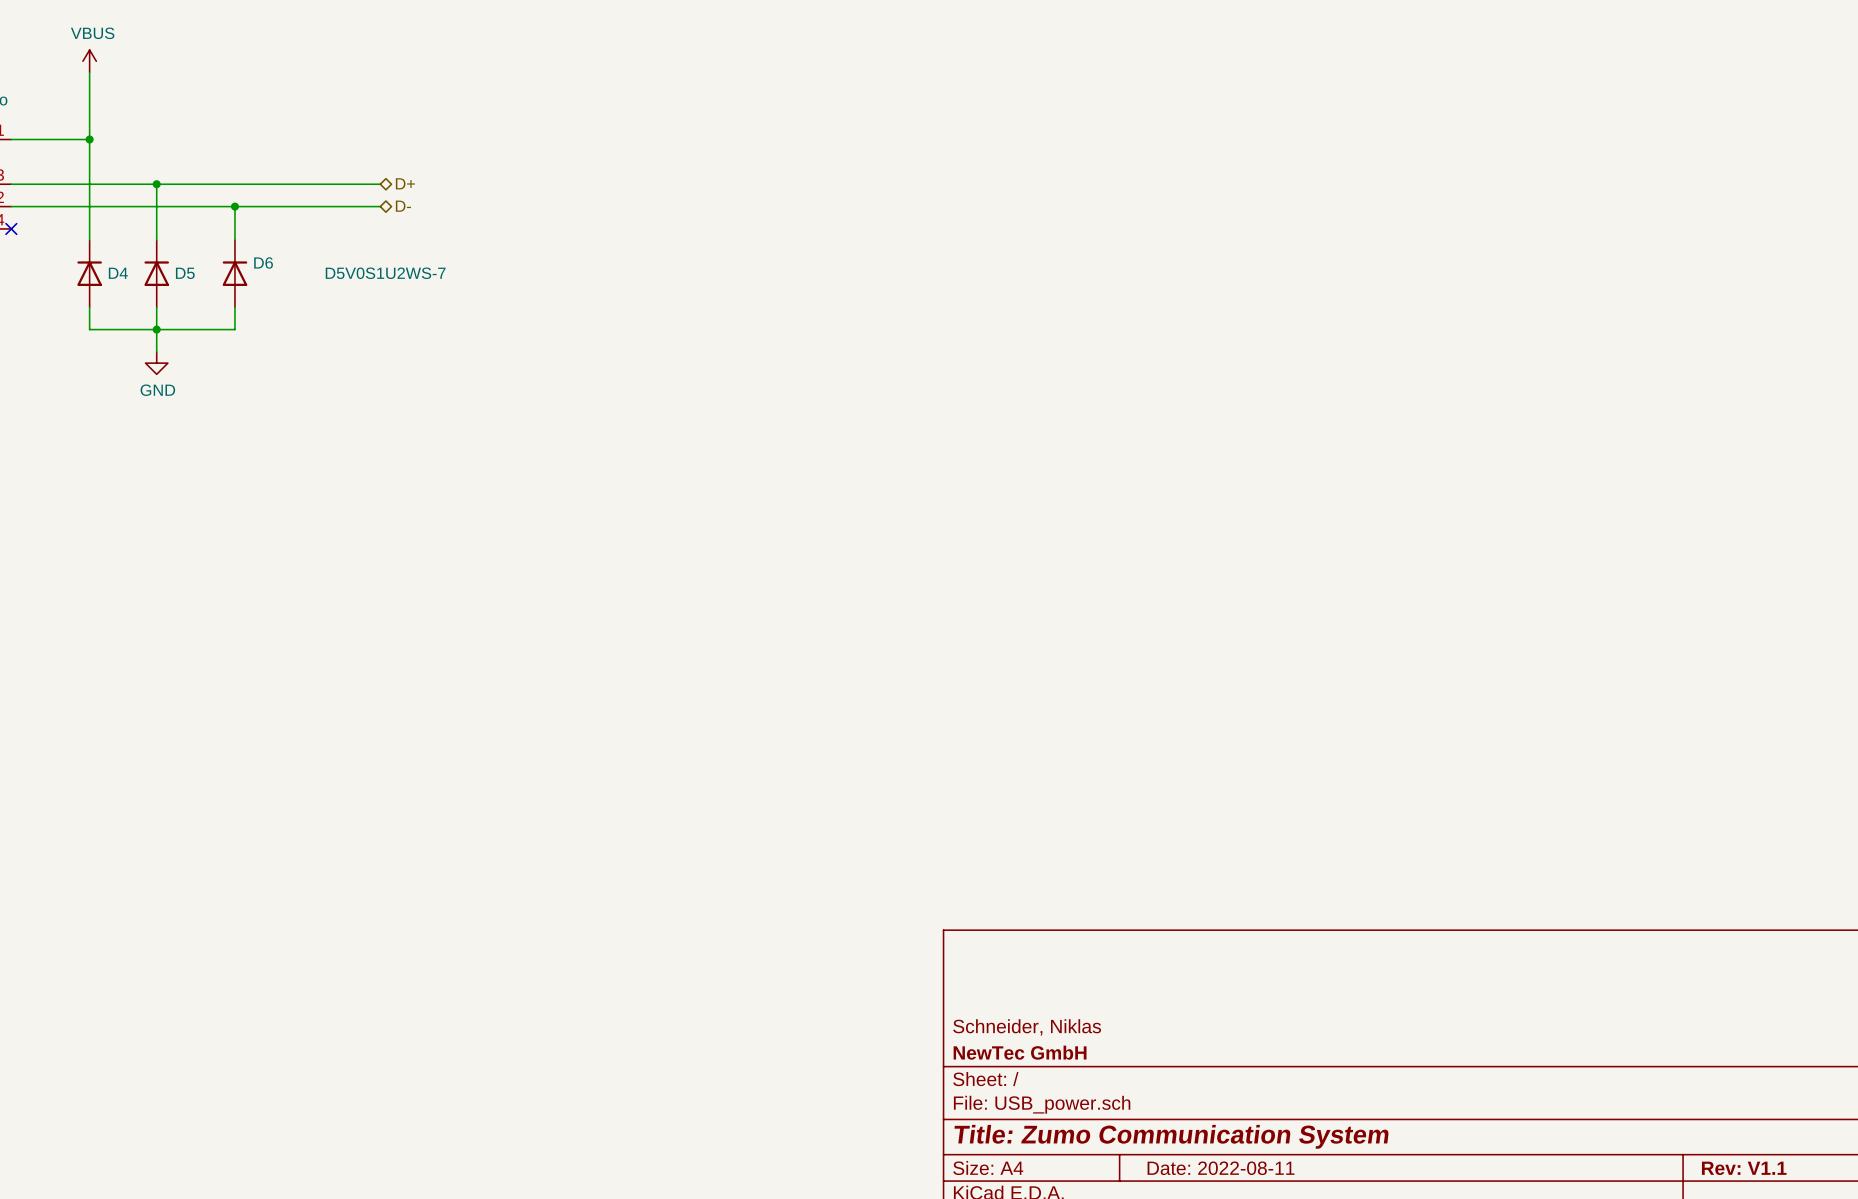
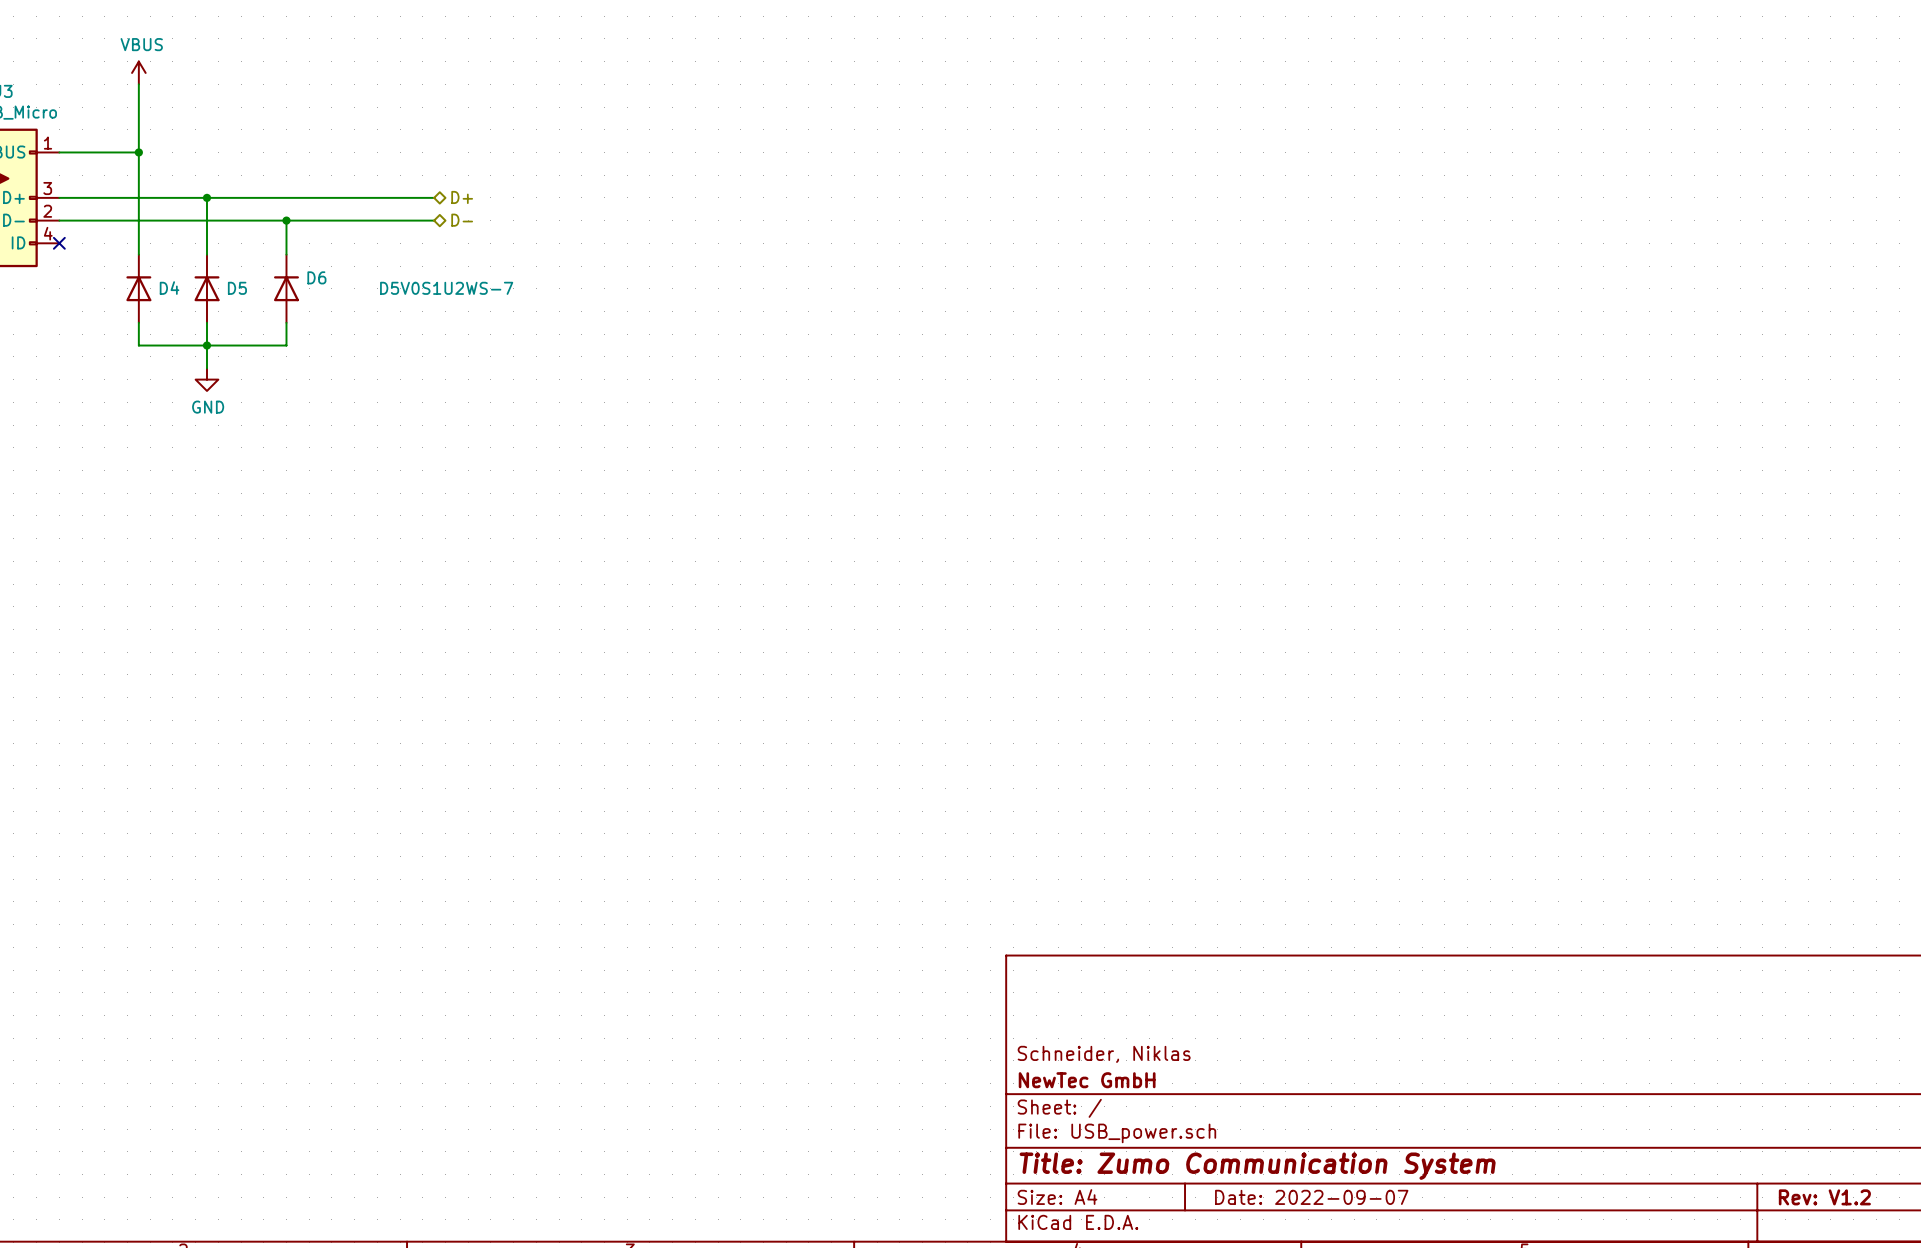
title block: Date: 2022-08-11 (1221, 1168) -> Date: 2022-09-07 (1311, 1197)
title block: Rev: V1.1 (1744, 1168) -> Rev: V1.2 (1824, 1197)

